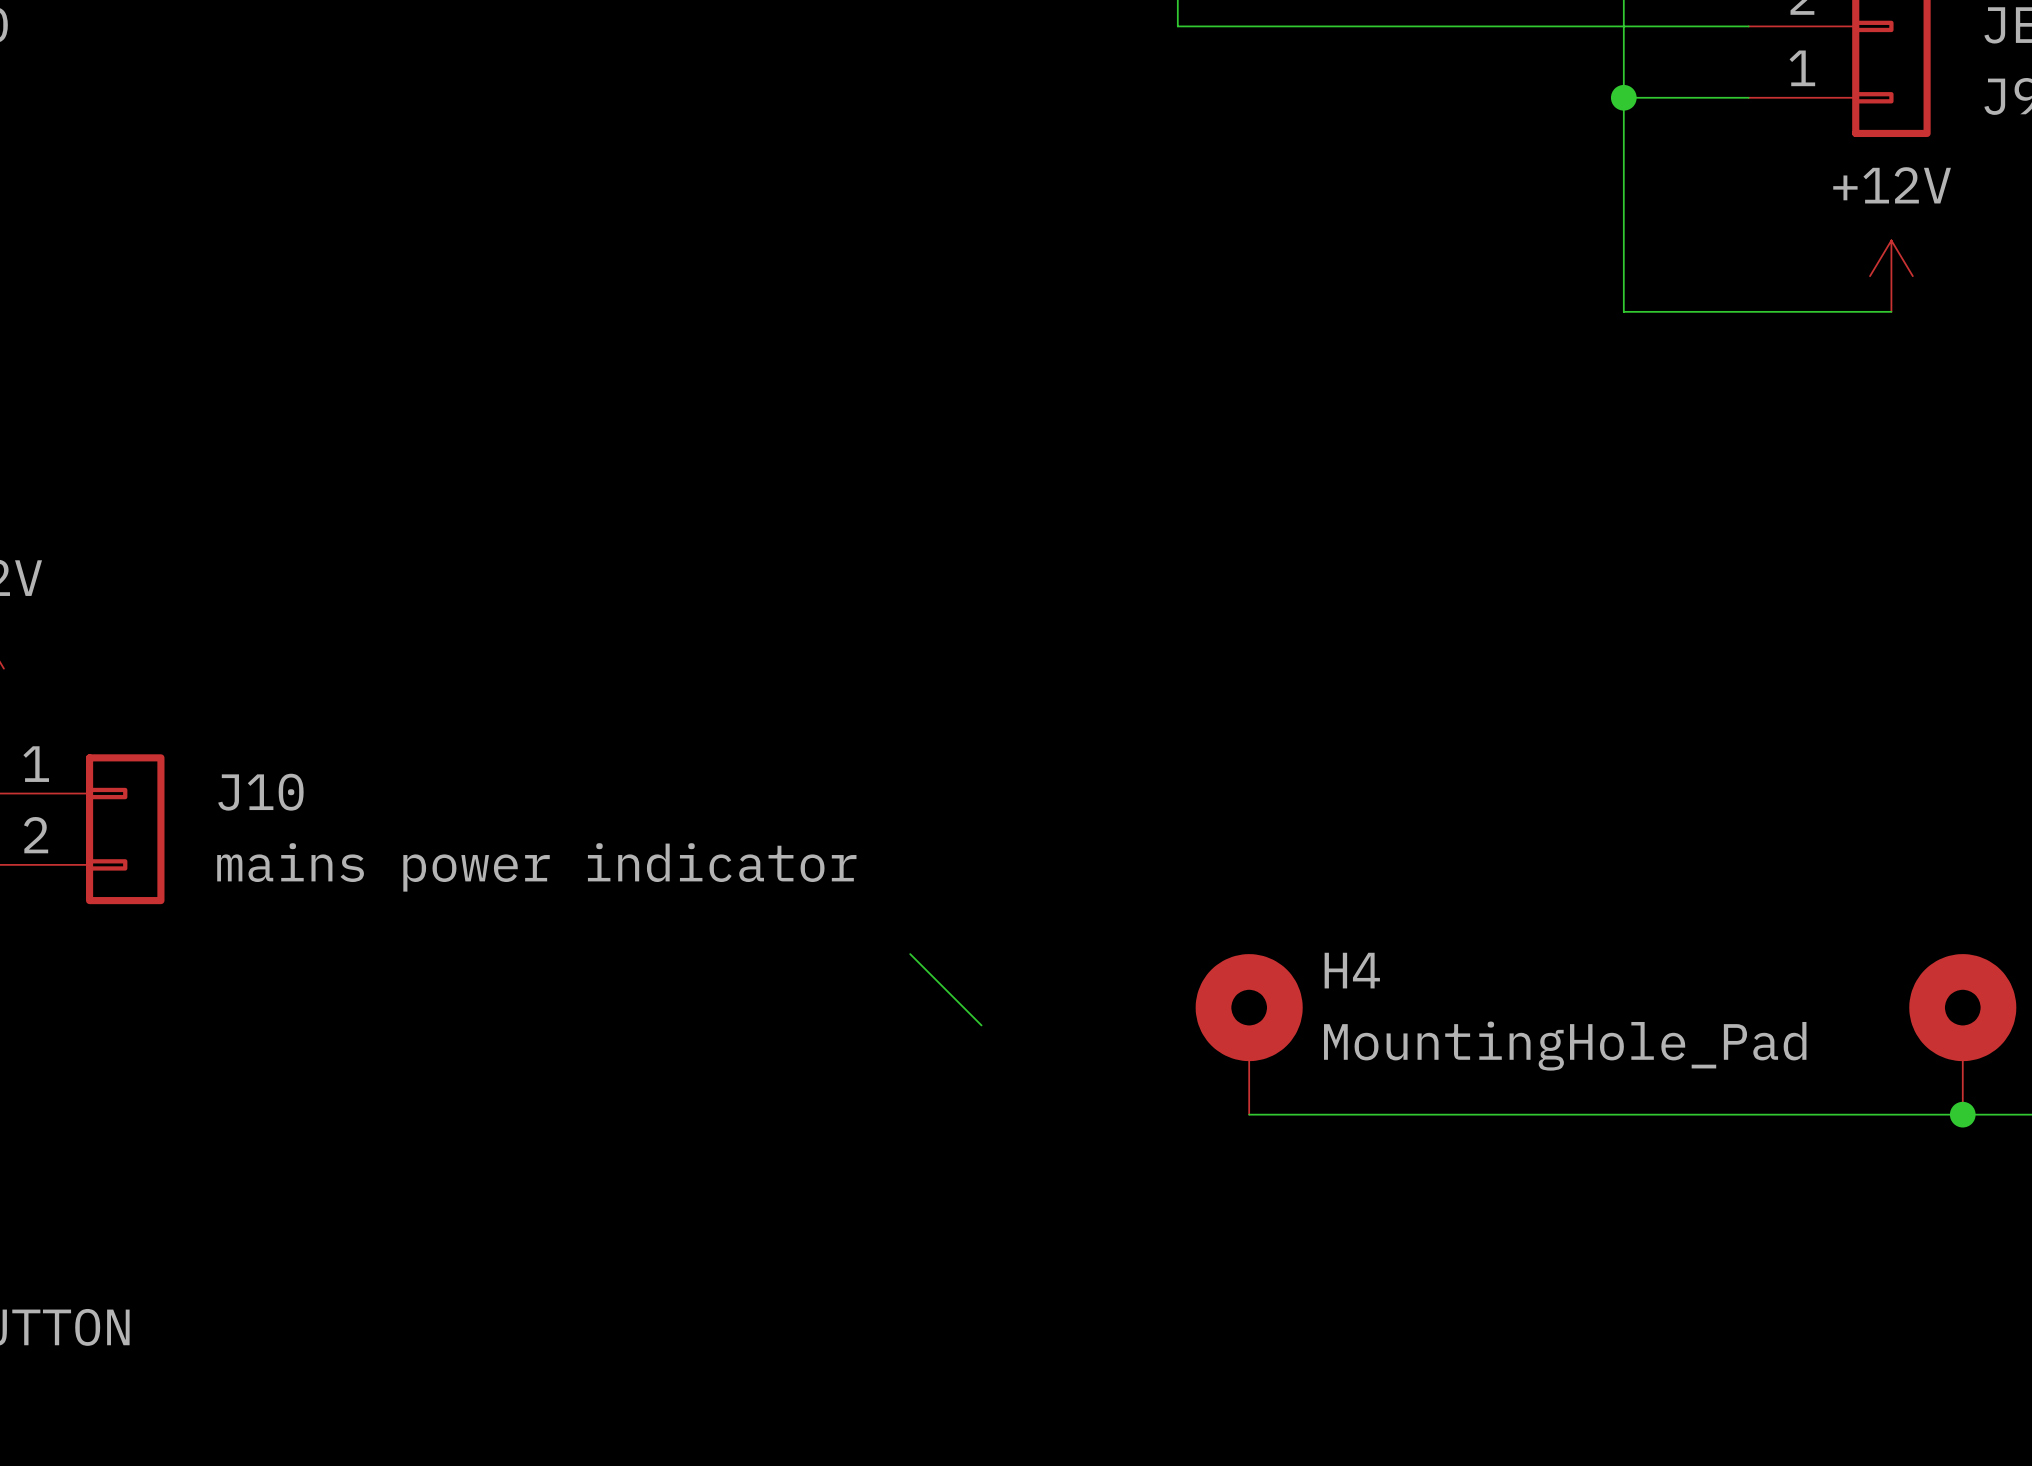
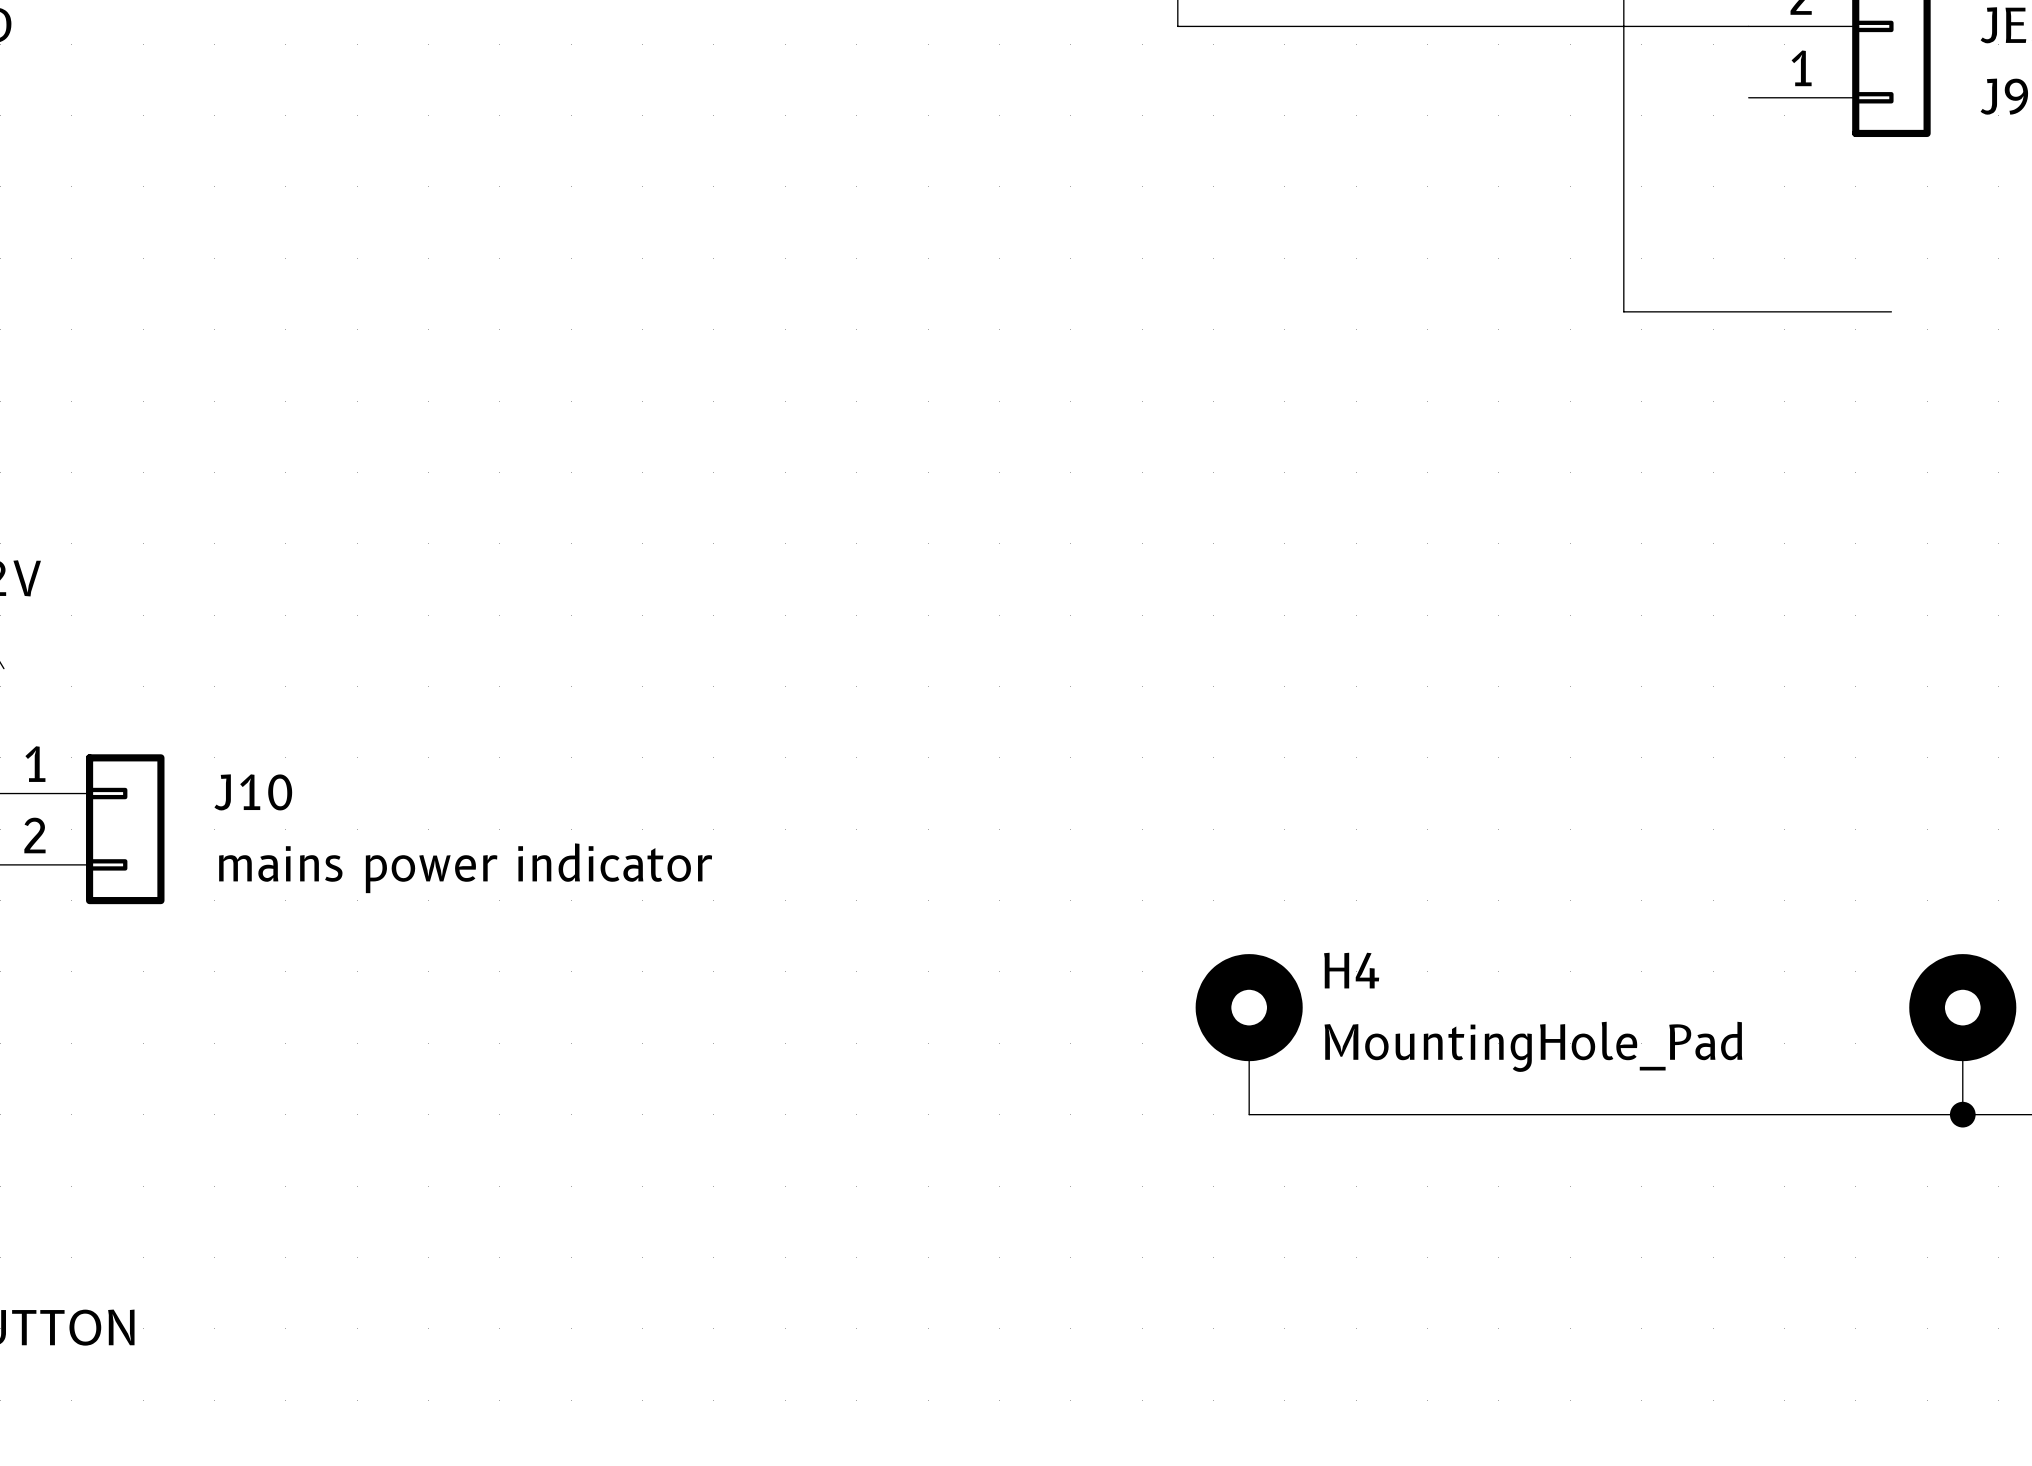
wire: (1623, 97) (1748, 97) -> none
junction: (1623, 97) -> none
power symbol: +12V (1891, 276) -> none
wire: (910, 954) (981, 1025) -> none

